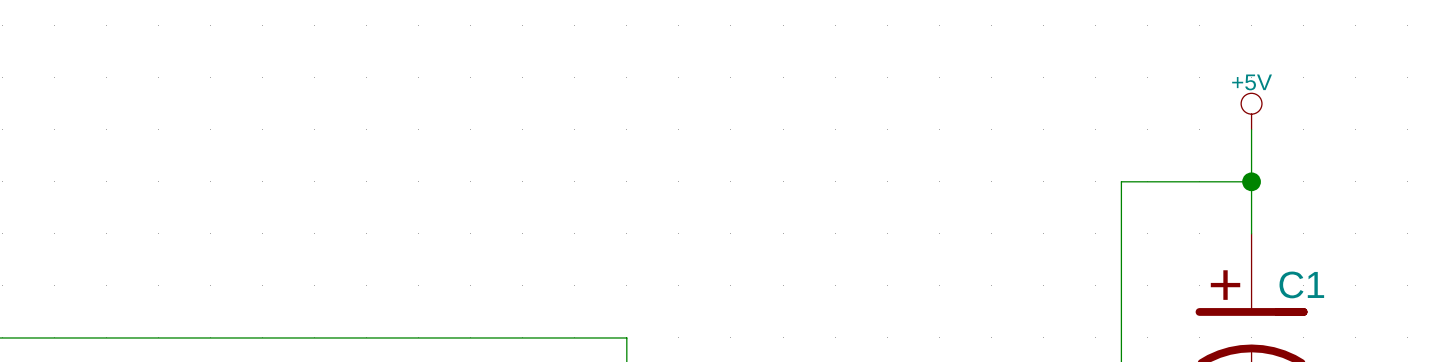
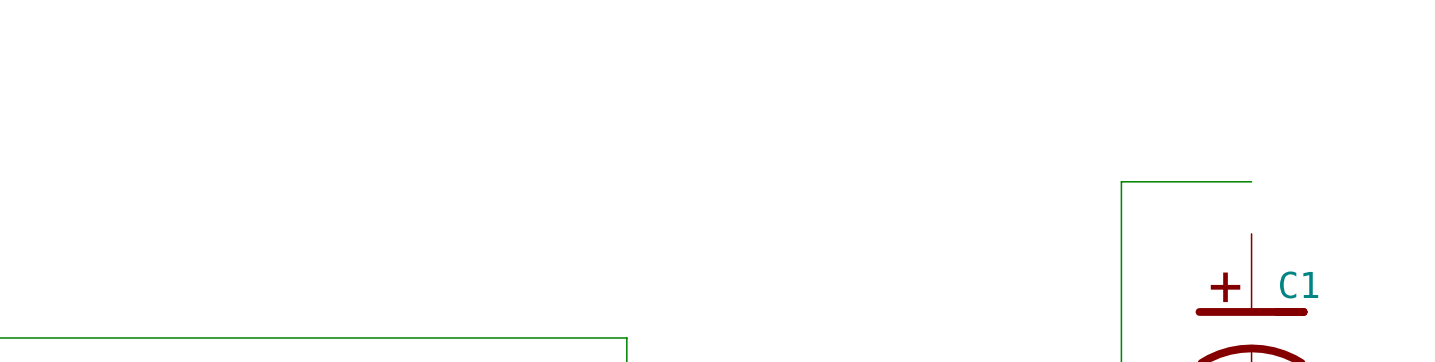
power symbol: +5V (1251, 111) -> none
wire: (1251, 129) (1251, 233) -> none
junction: (1251, 181) -> none

